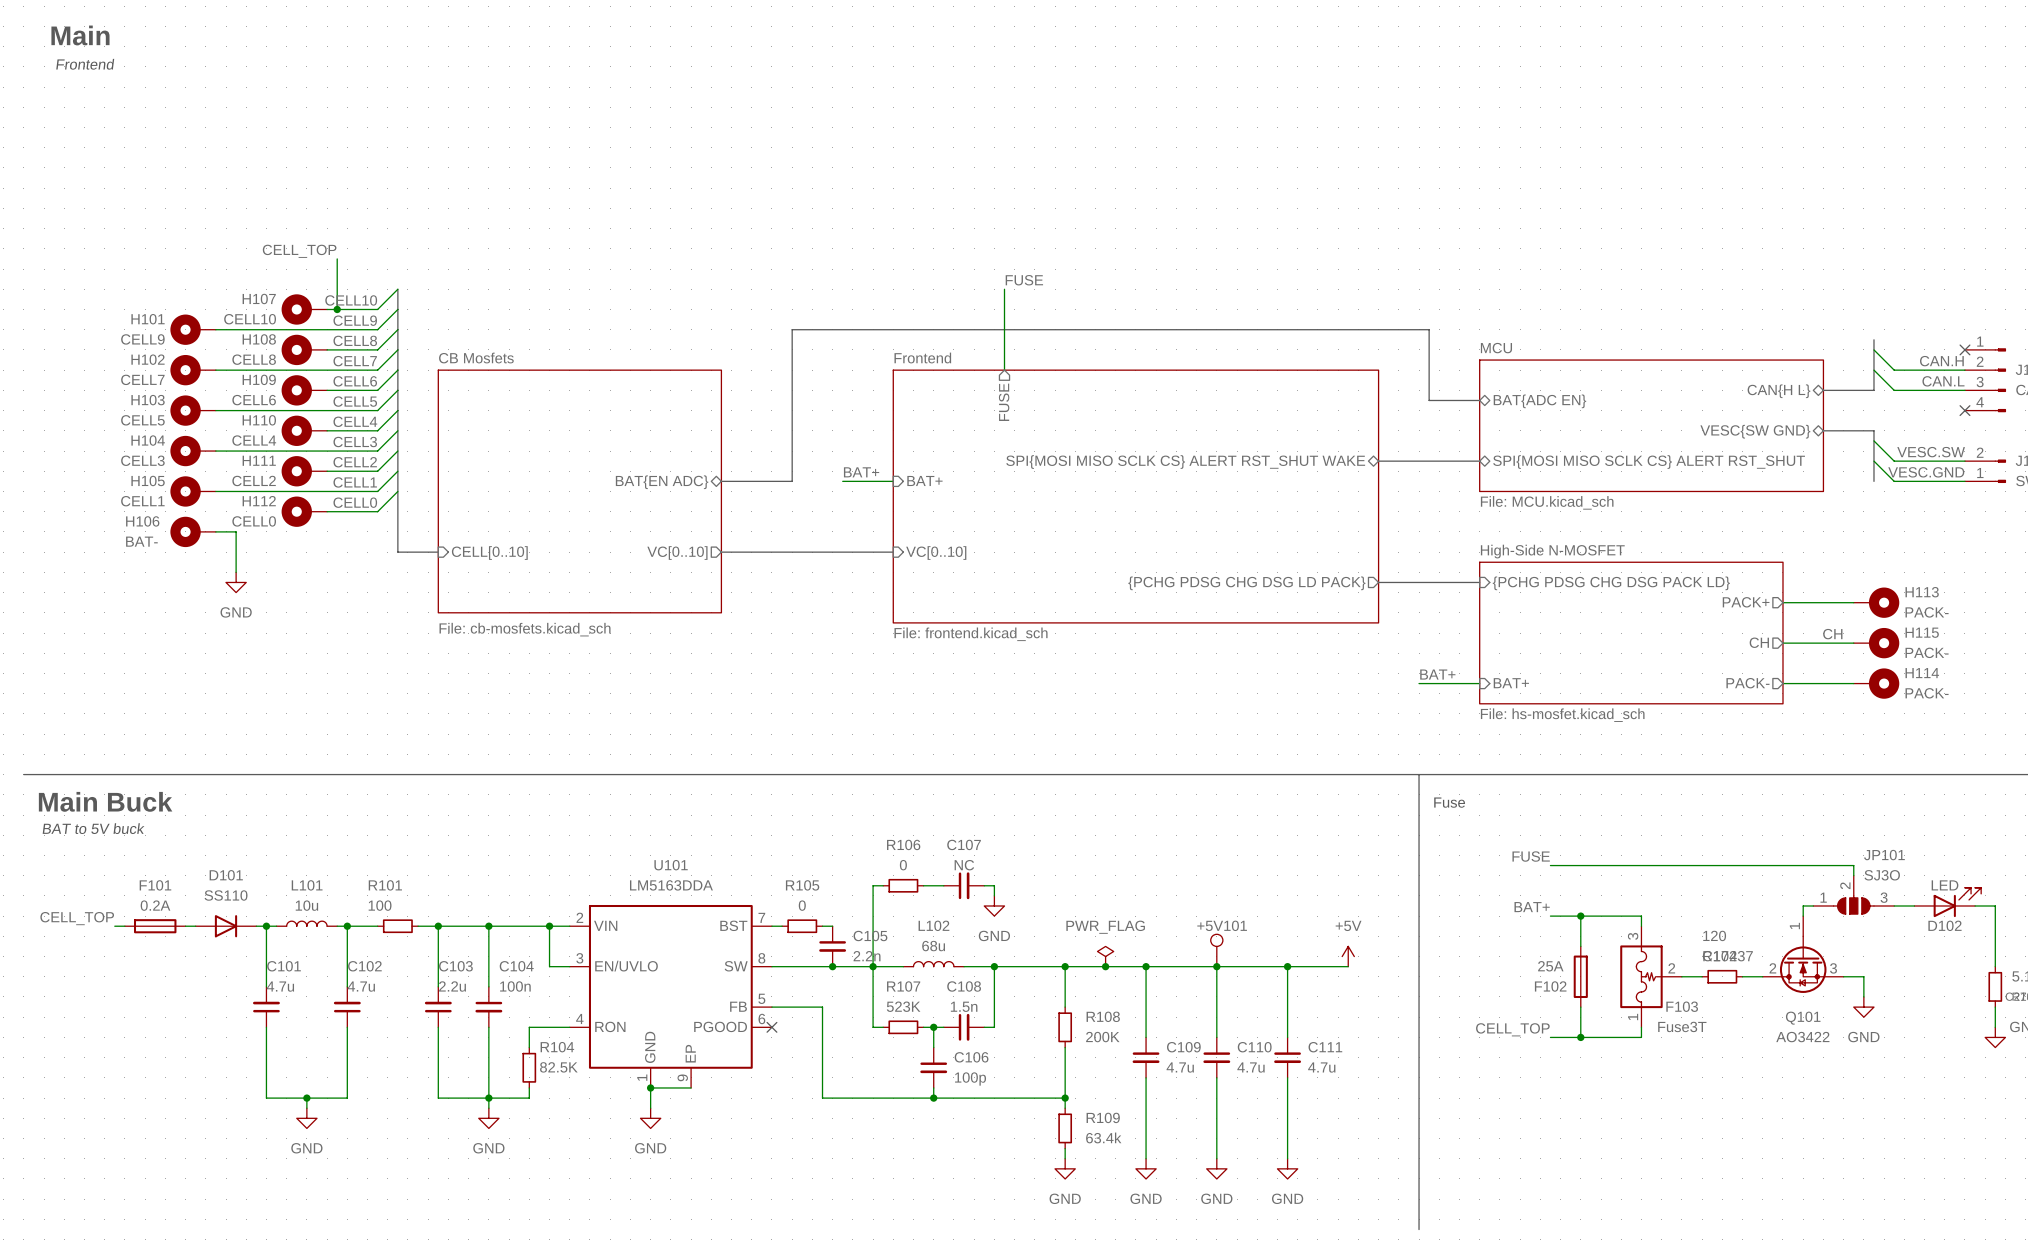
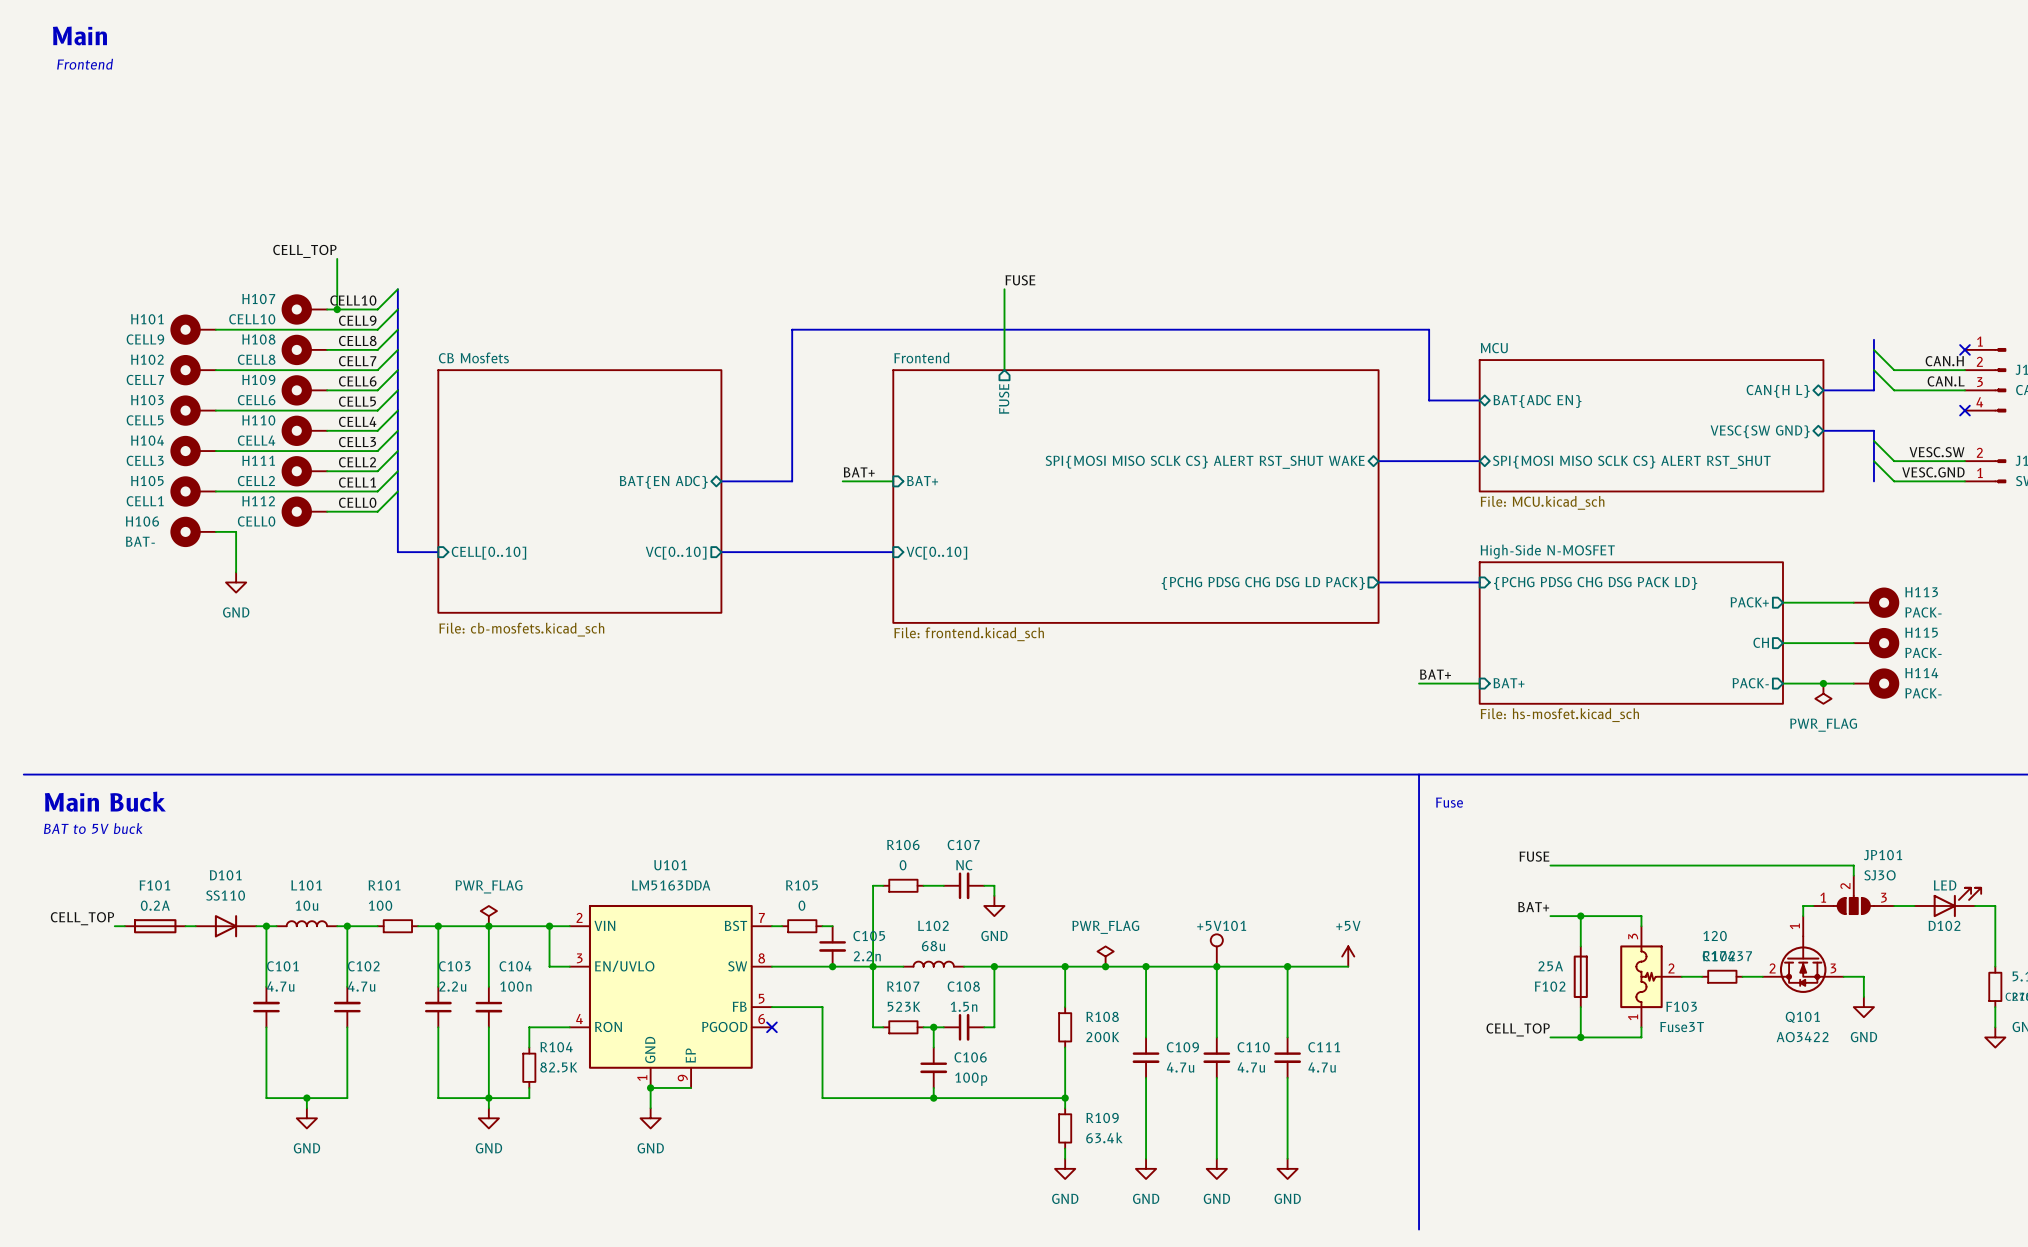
label: CH (1832, 634) -> none
junction: none -> (1823, 683)
power symbol: none -> PWR_FLAG (1823, 693)
power symbol: none -> PWR_FLAG (488, 916)

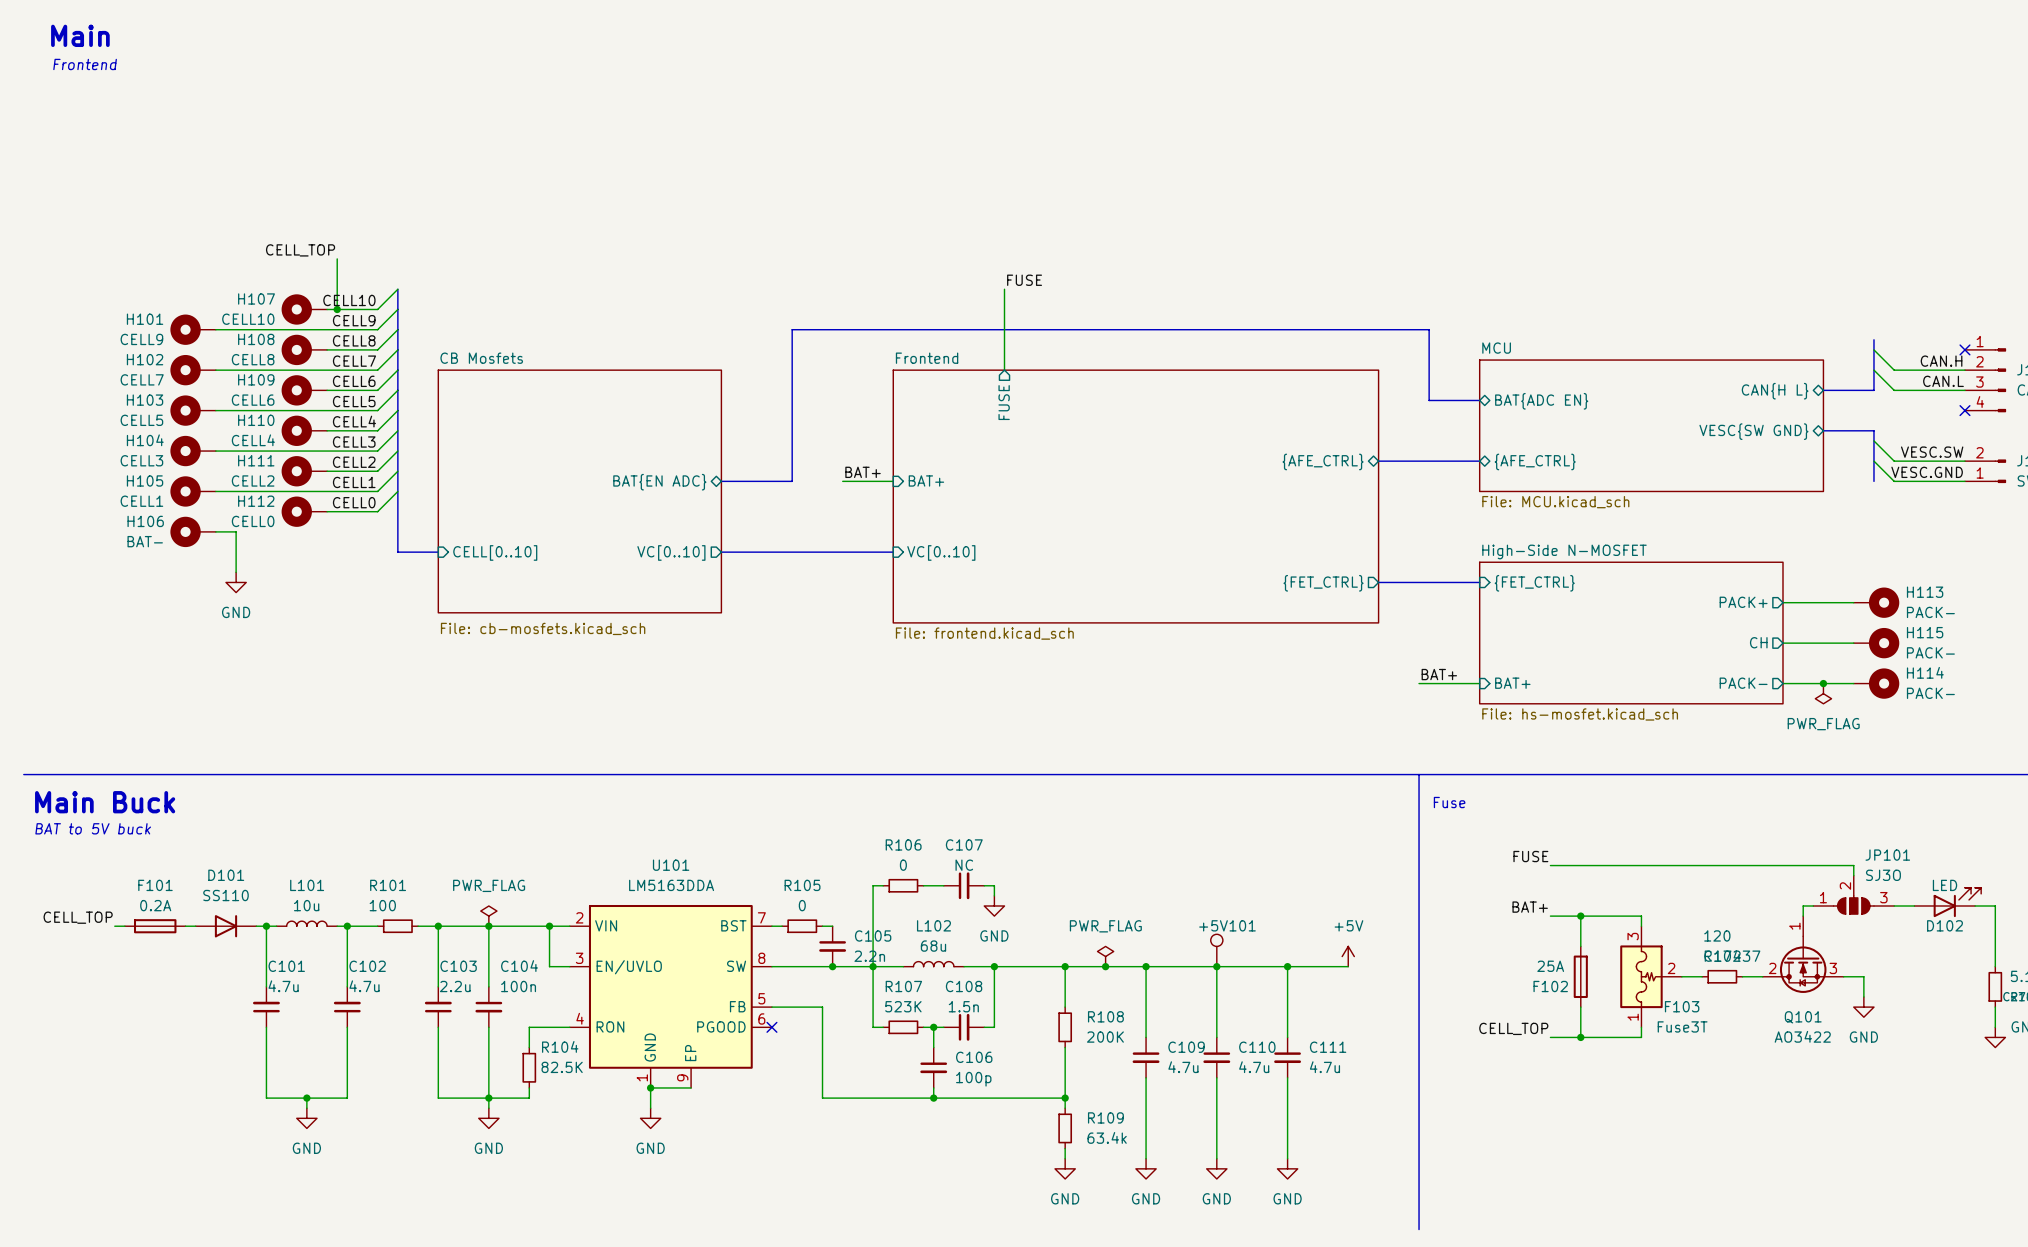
sheet pin: SPI{MOSI MISO SCLK CS} ALERT RST_SHUT WAKE (1205, 462) -> {AFE_CTRL} (1323, 461)
sheet pin: SPI{MOSI MISO SCLK CS} ALERT RST_SHUT (1631, 462) -> {AFE_CTRL} (1535, 461)
sheet pin: {PCHG PDSG CHG DSG LD PACK} (1263, 583) -> {FET_CTRL} (1323, 583)
sheet pin: {PCHG PDSG CHG DSG PACK LD} (1595, 583) -> {FET_CTRL} (1534, 583)

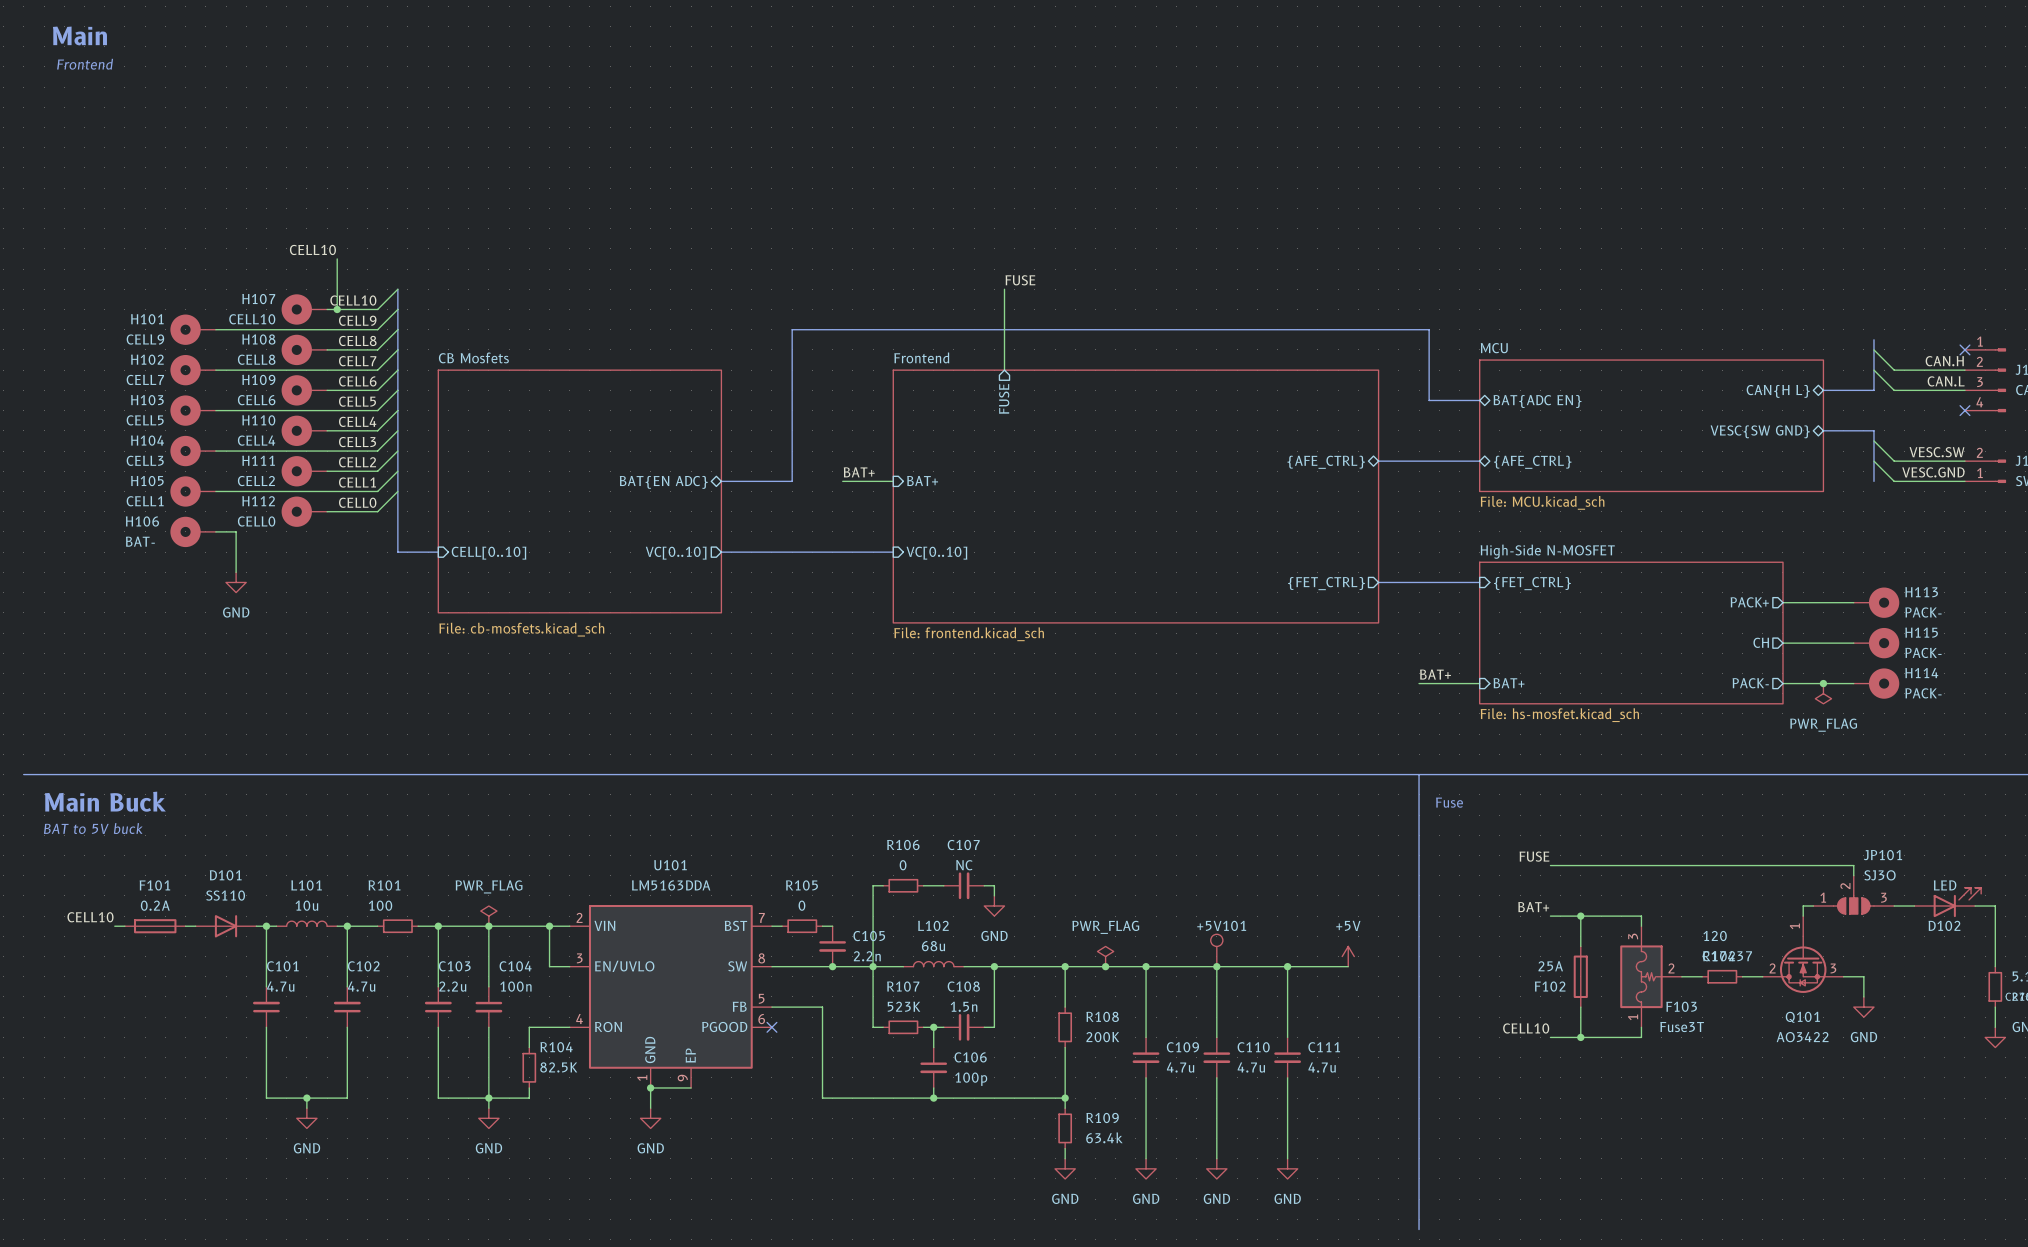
label: CELL_TOP (300, 250) -> CELL10 (312, 249)
label: CELL_TOP (78, 917) -> CELL10 (90, 917)
label: CELL_TOP (1513, 1028) -> CELL10 (1526, 1028)

